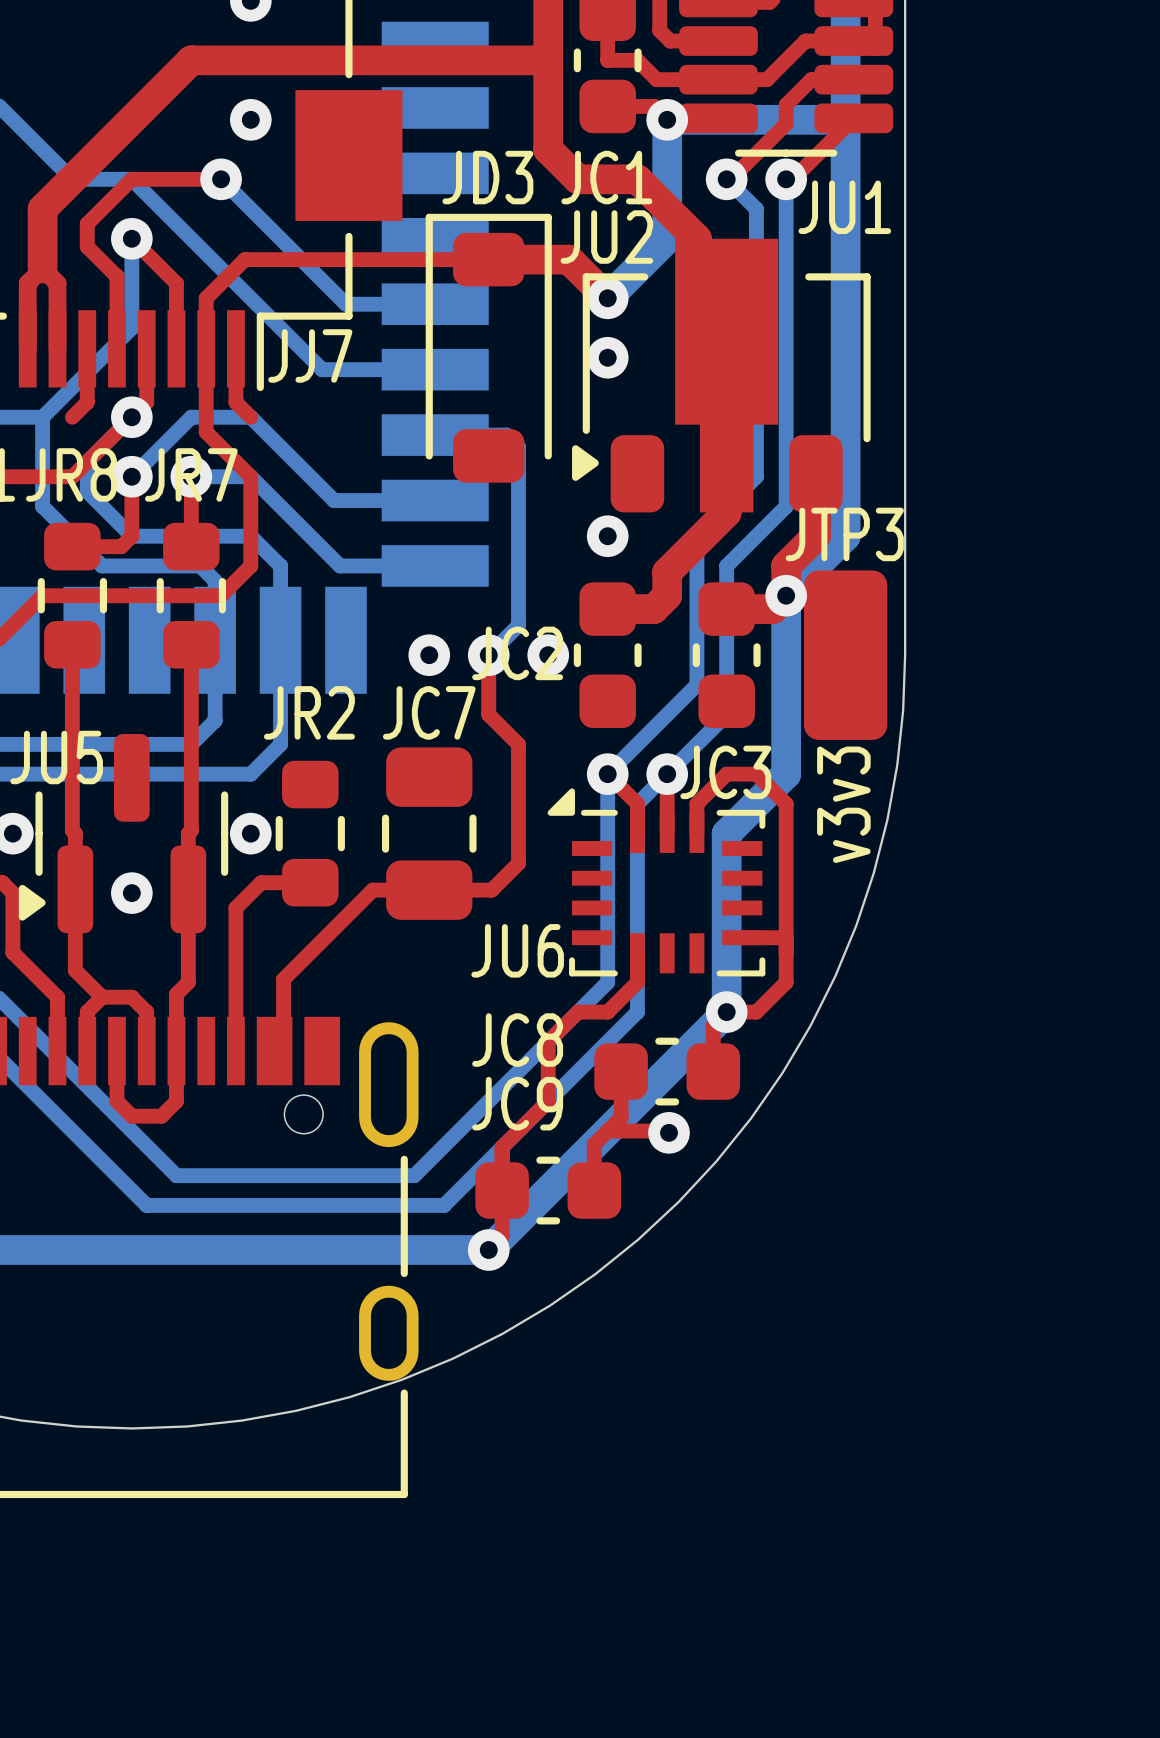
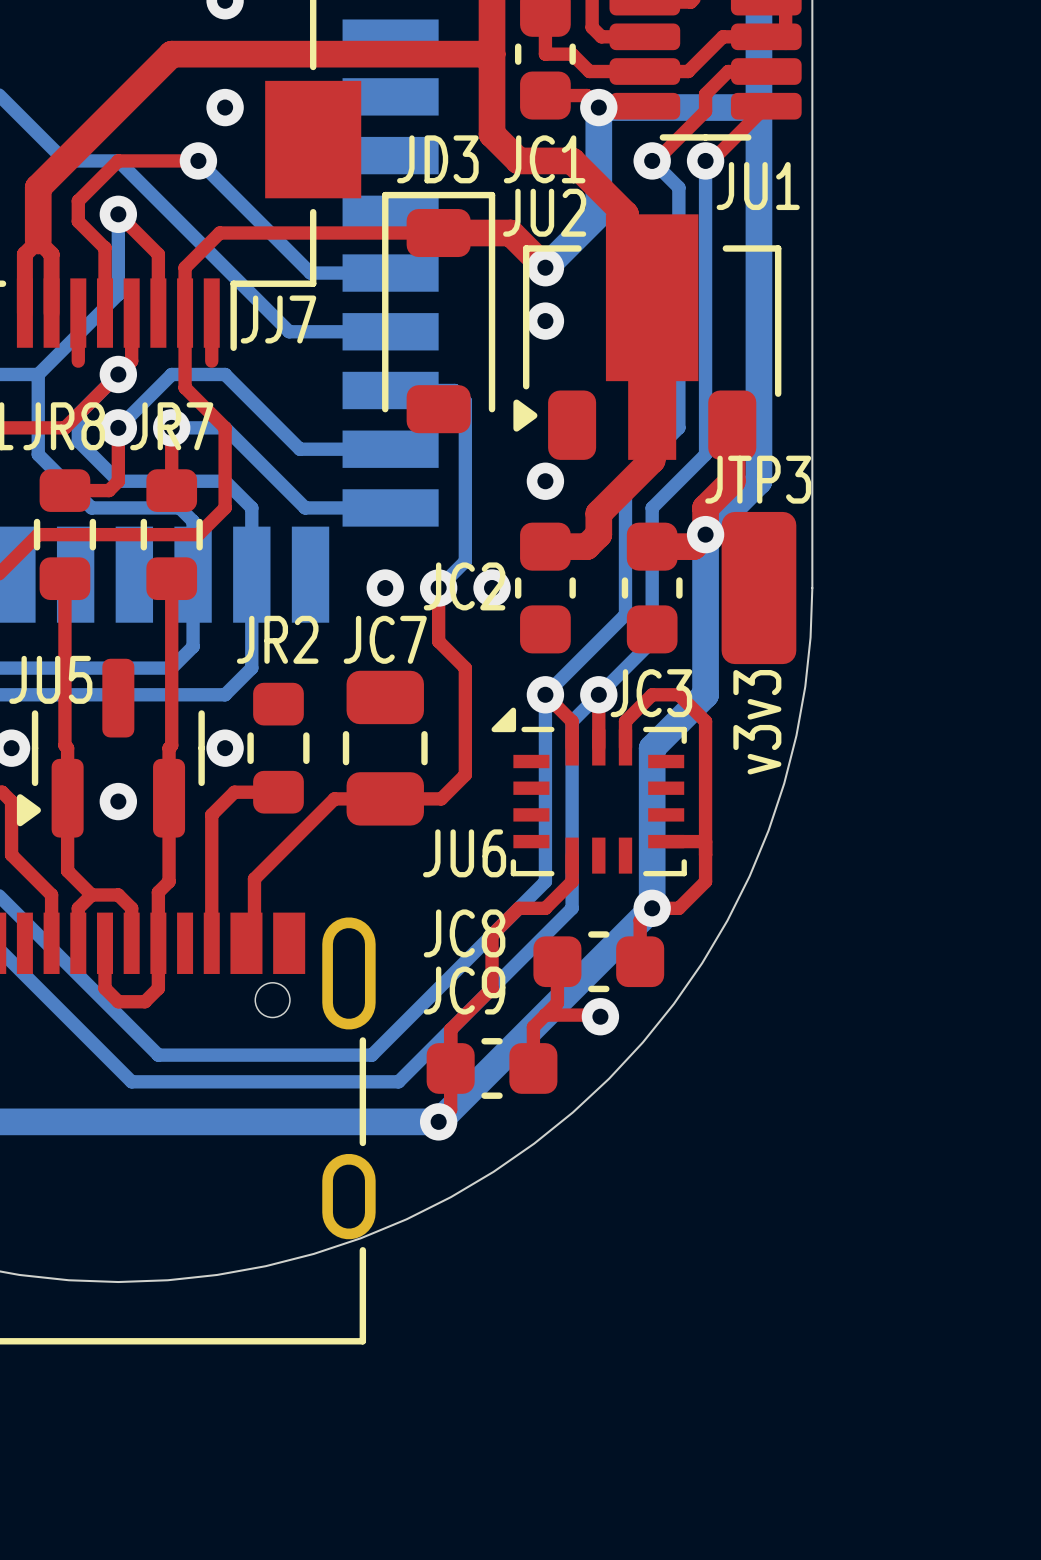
top track: (87, 402) (72, 417) -> none
top track: (235, 402) (250, 417) -> none

